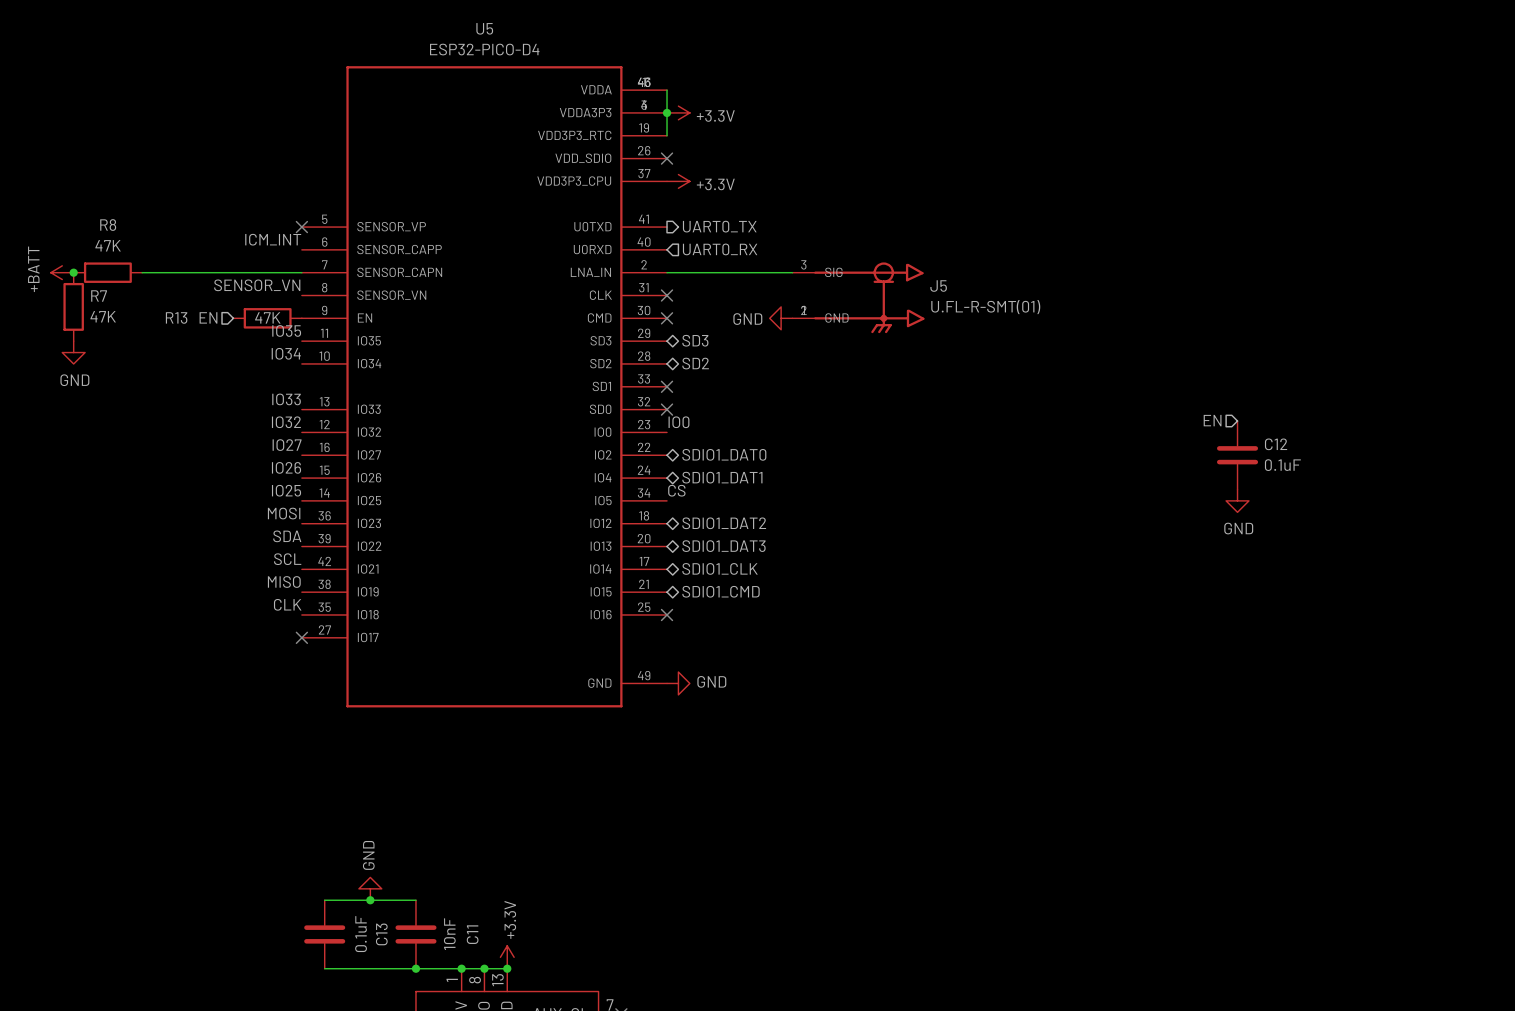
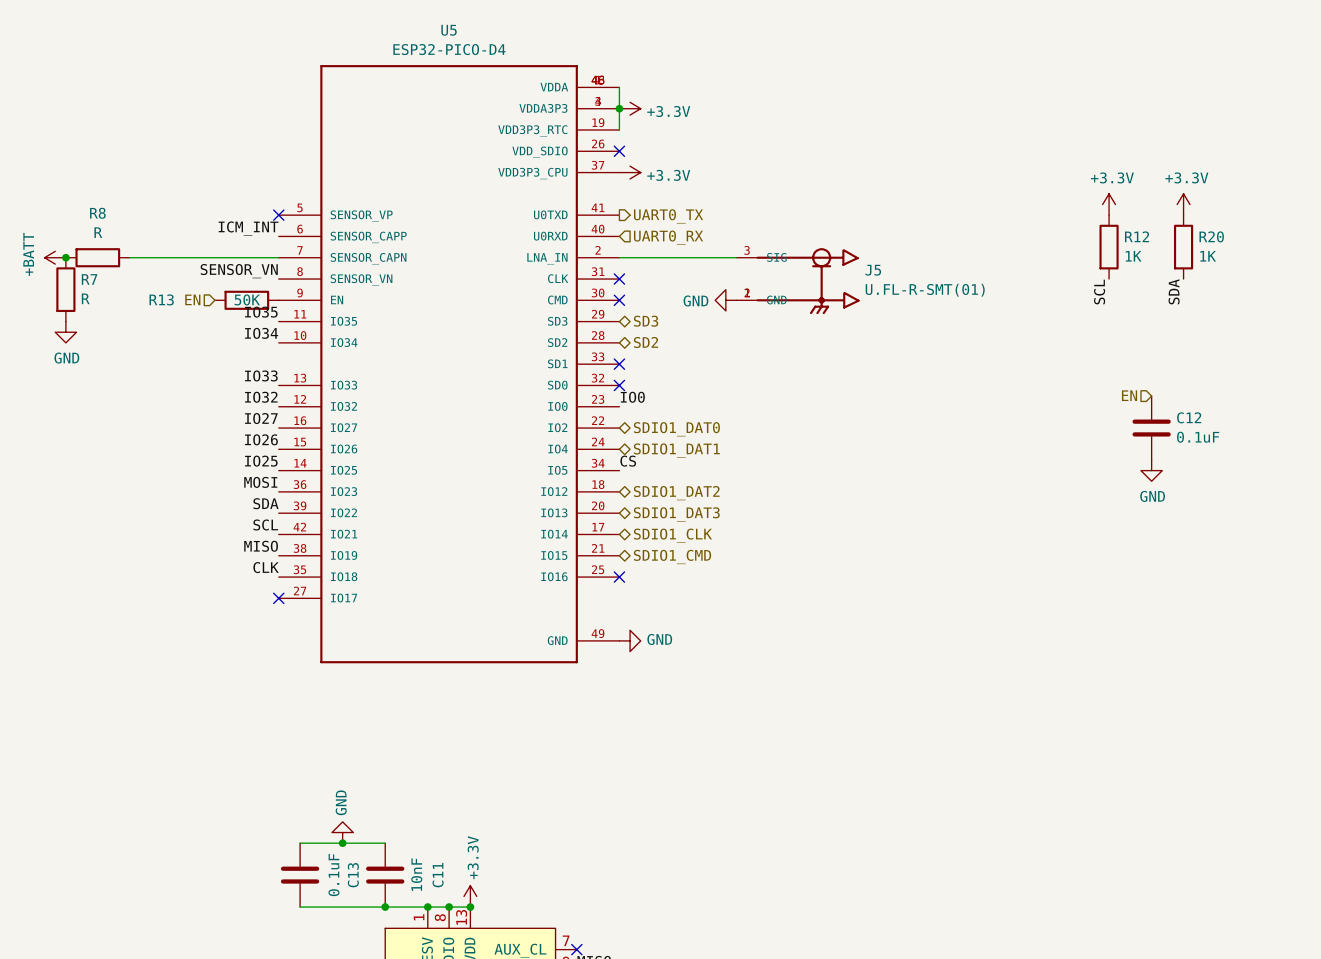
power symbol: none -> +3.3V (1109, 204)
power symbol: none -> +3.3V (1183, 204)
R8 value: 47K (108, 245) -> R (98, 232)
R12: none -> 1K (1109, 247)
R20: none -> 1K (1183, 247)
label: none -> SCL (1099, 292)
label: none -> SDA (1174, 291)
R7 value: 47K (103, 316) -> R (85, 298)
R13 value: 47K (267, 317) -> 50K (247, 299)

